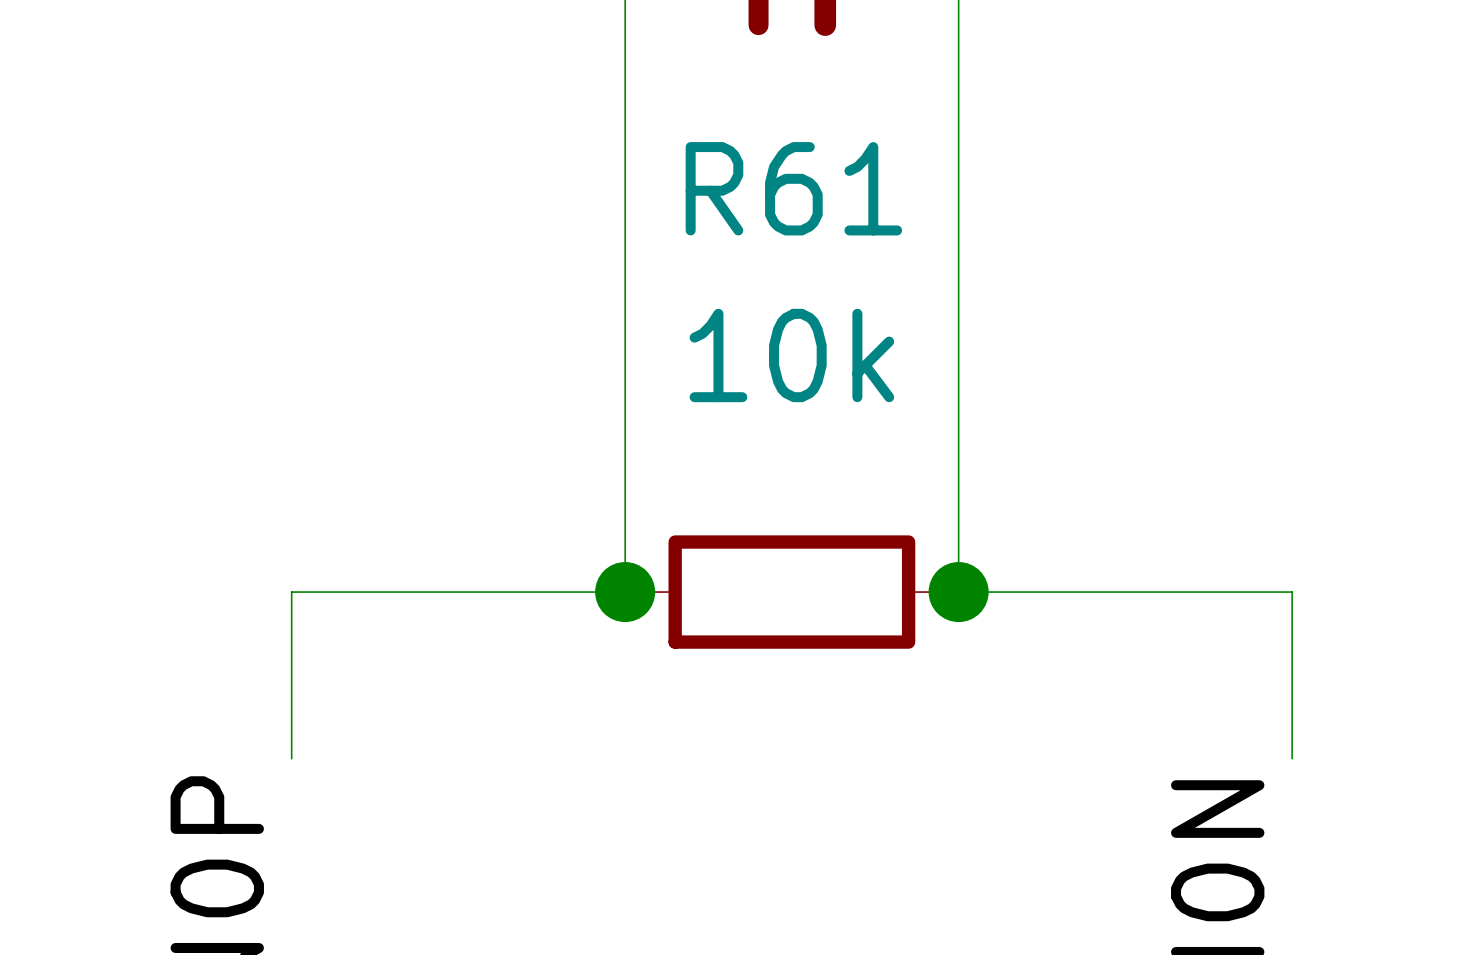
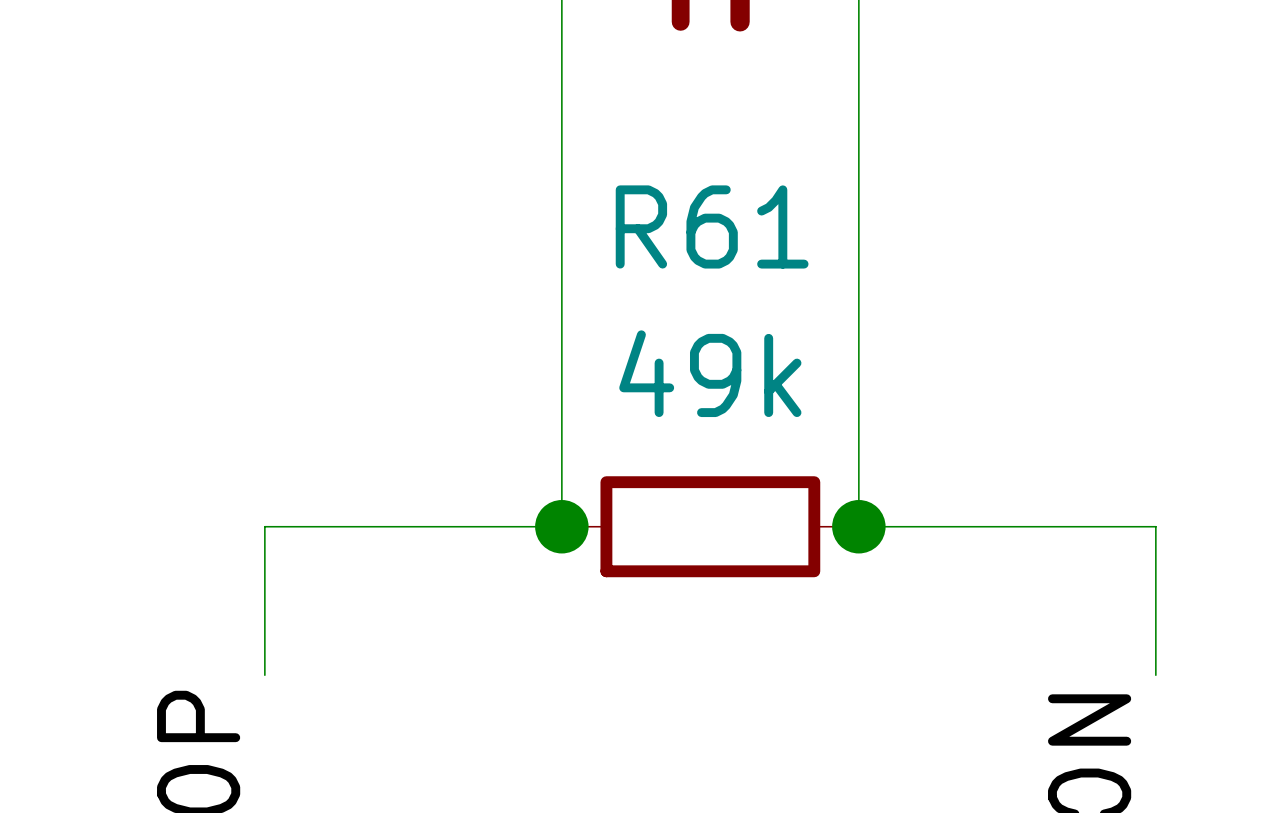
R61 name position: R61 (793, 188) -> R61 (712, 226)
R61 value: 10k (791, 355) -> 49k (710, 373)

